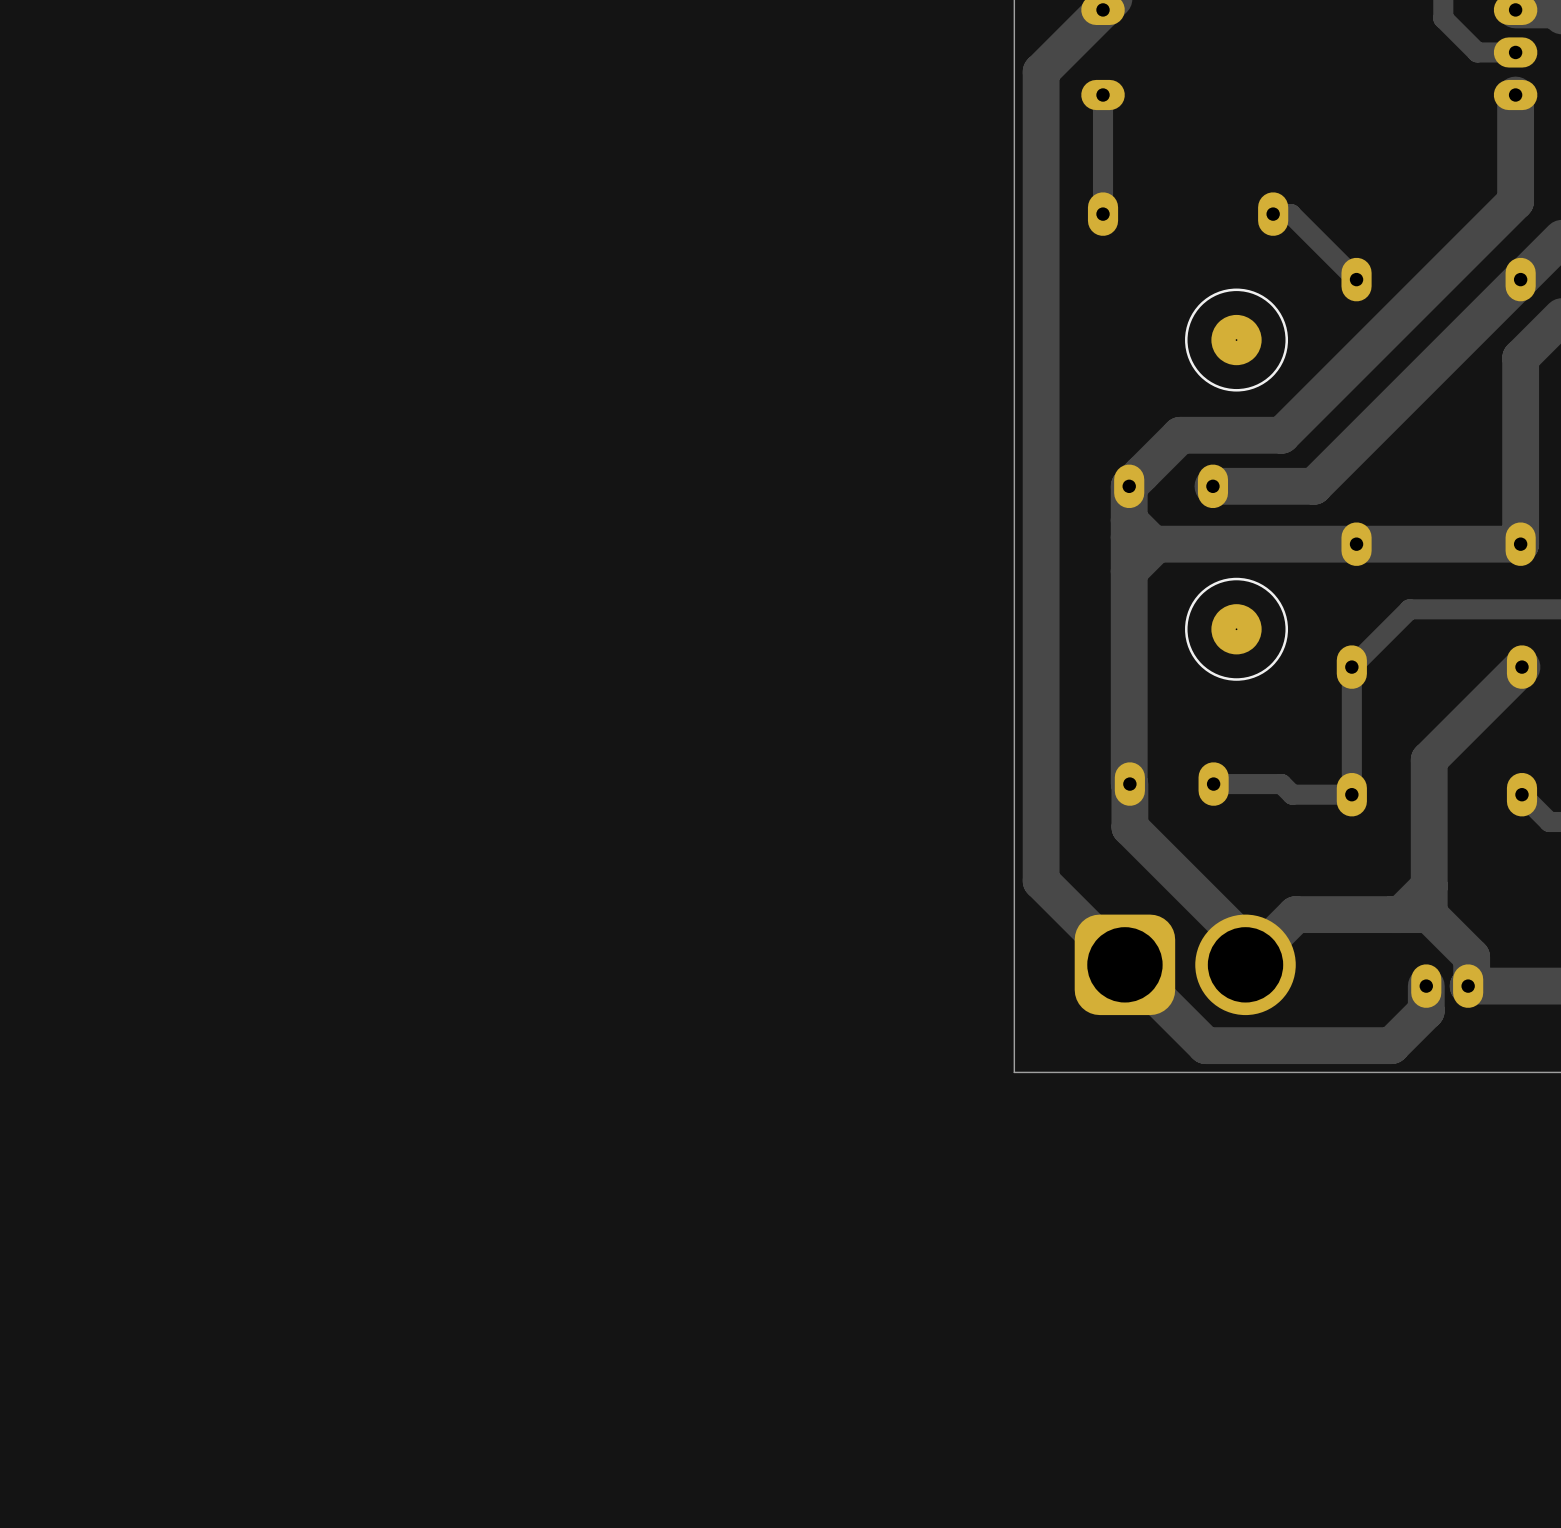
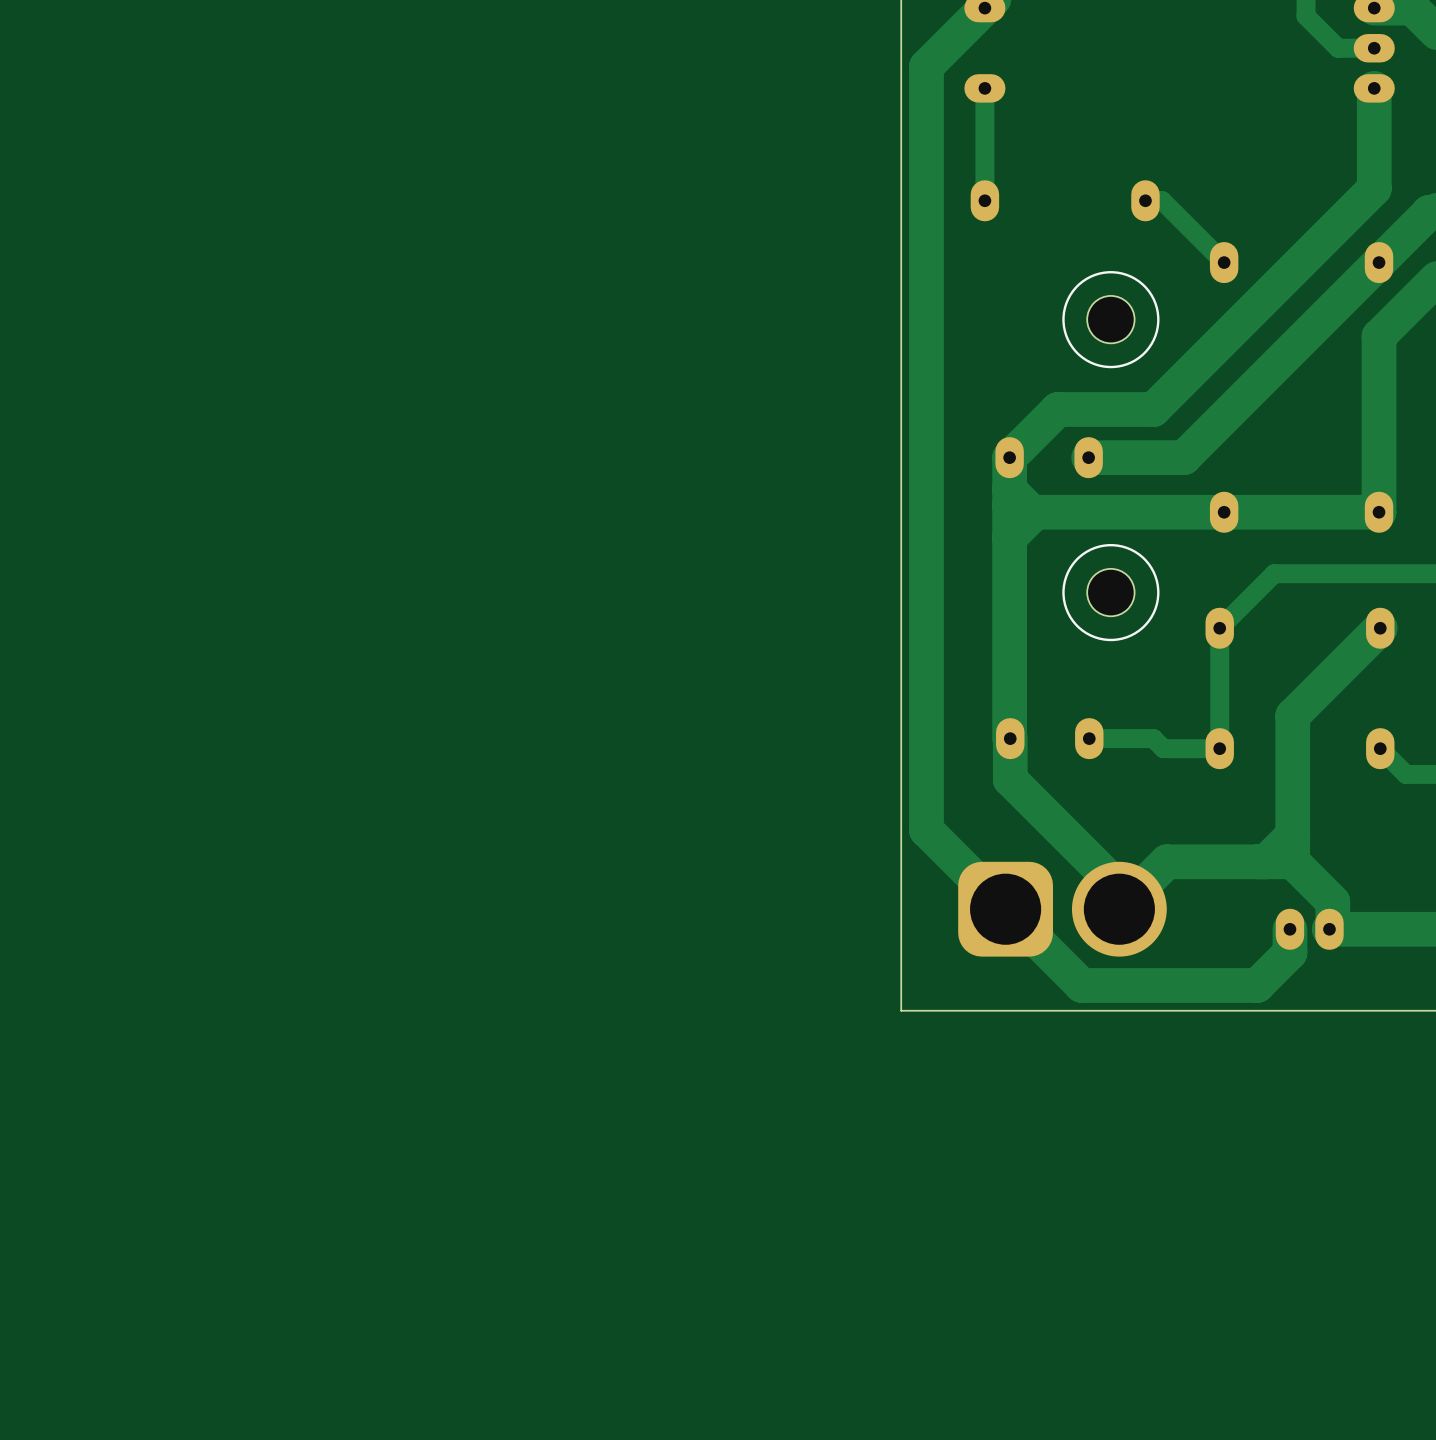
part footprint: [1185, 288, 1289, 392] -> [1062, 271, 1160, 369]
part footprint: [1185, 577, 1289, 681] -> [1062, 543, 1160, 642]

